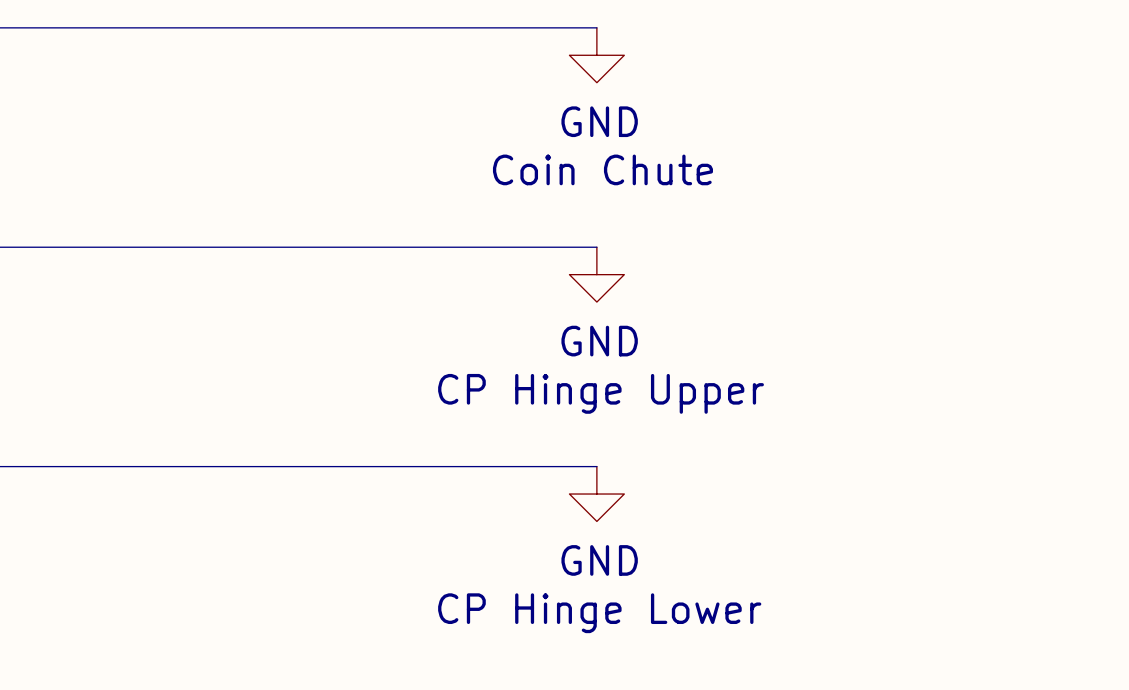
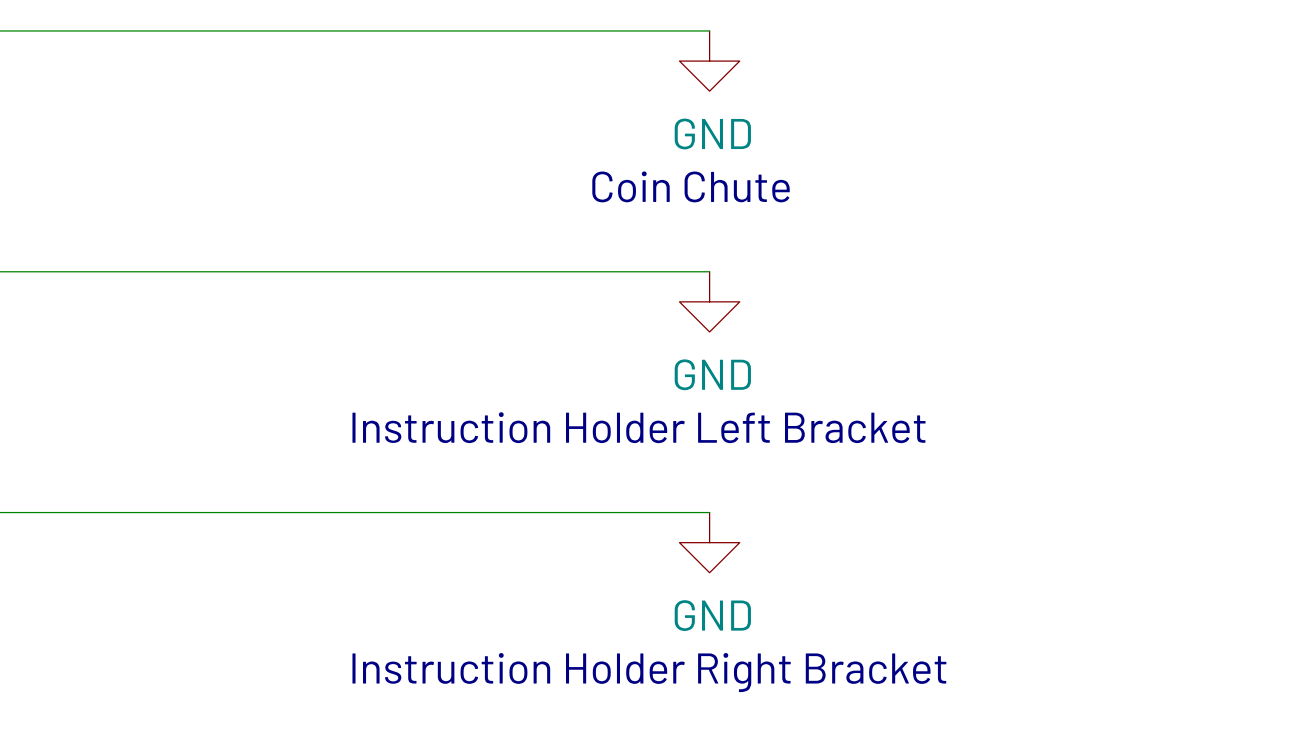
text: none -> Instruction Holder Left Bracket (639, 427)
text: CP Hinge Upper (601, 393) -> none
text: CP Hinge Lower (599, 613) -> none
text: none -> Instruction Holder Right Bracket (649, 672)

